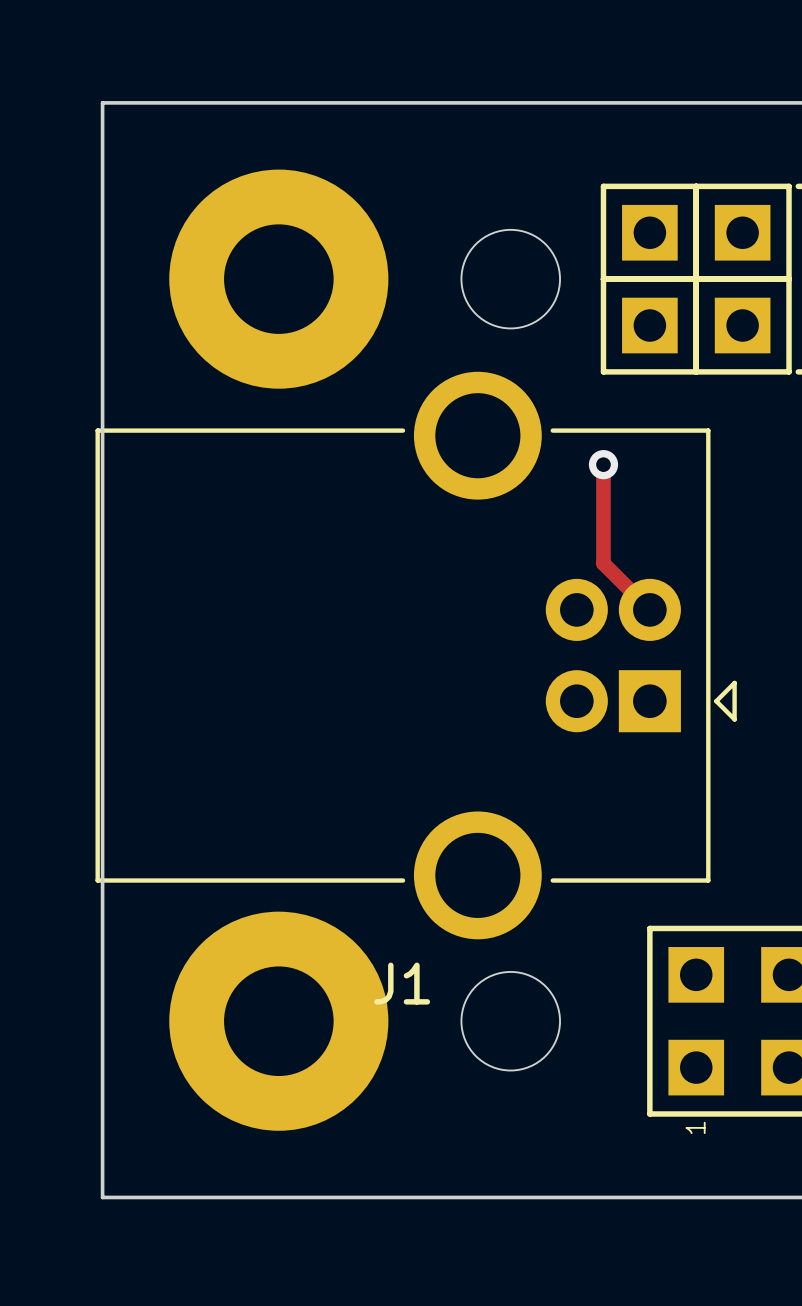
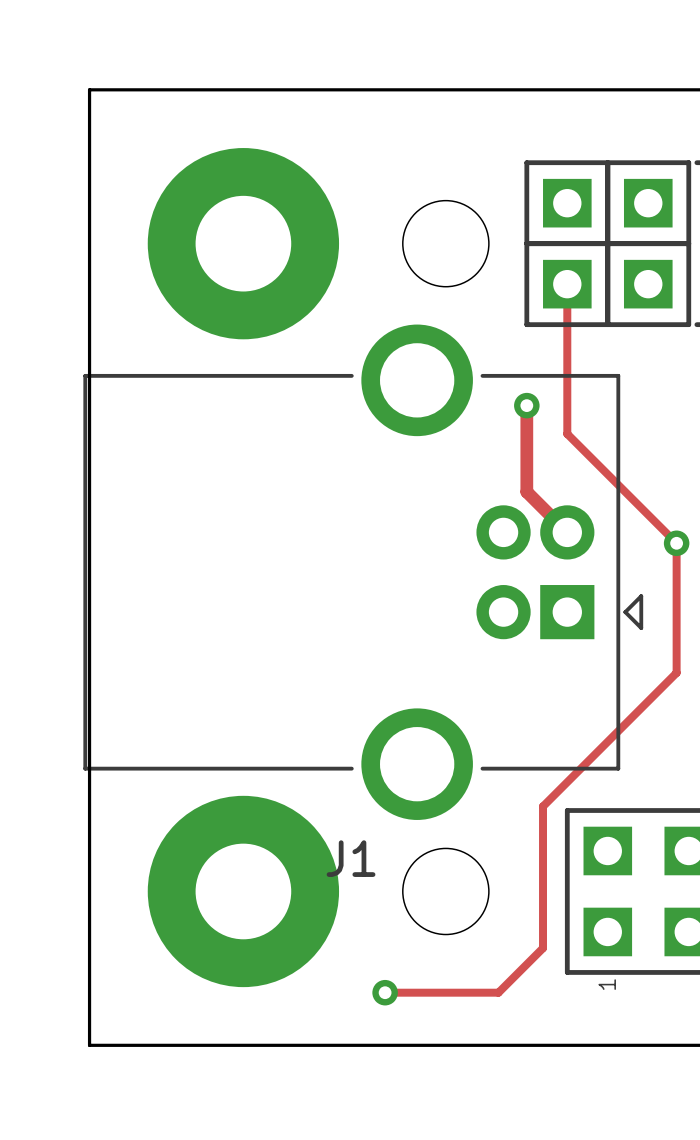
track: none -> (567, 284) (567, 433) (676, 543) (676, 672) (543, 806) (543, 948) (498, 992) (385, 992)
via: none -> (676, 543)
via: none -> (385, 992)

